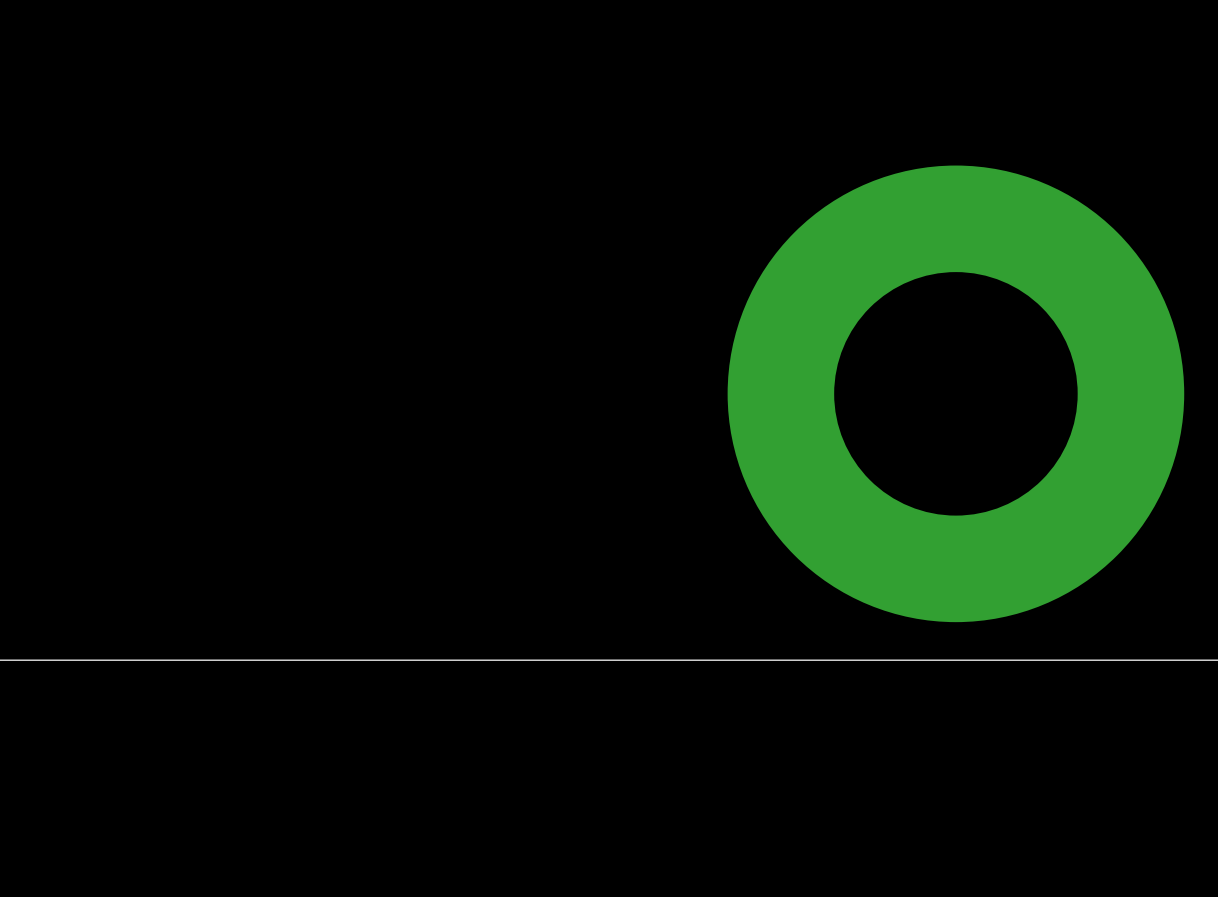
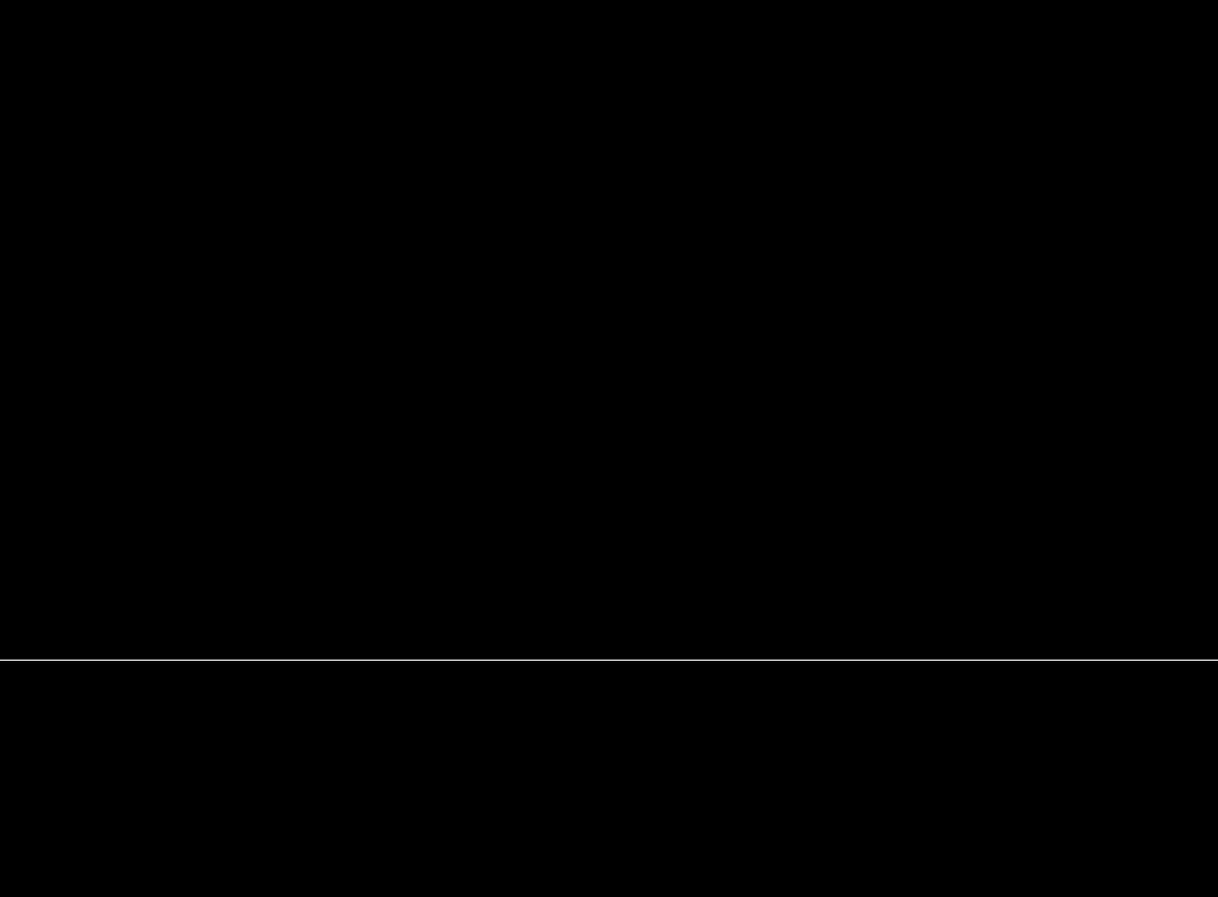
part: (955, 393) -> none

